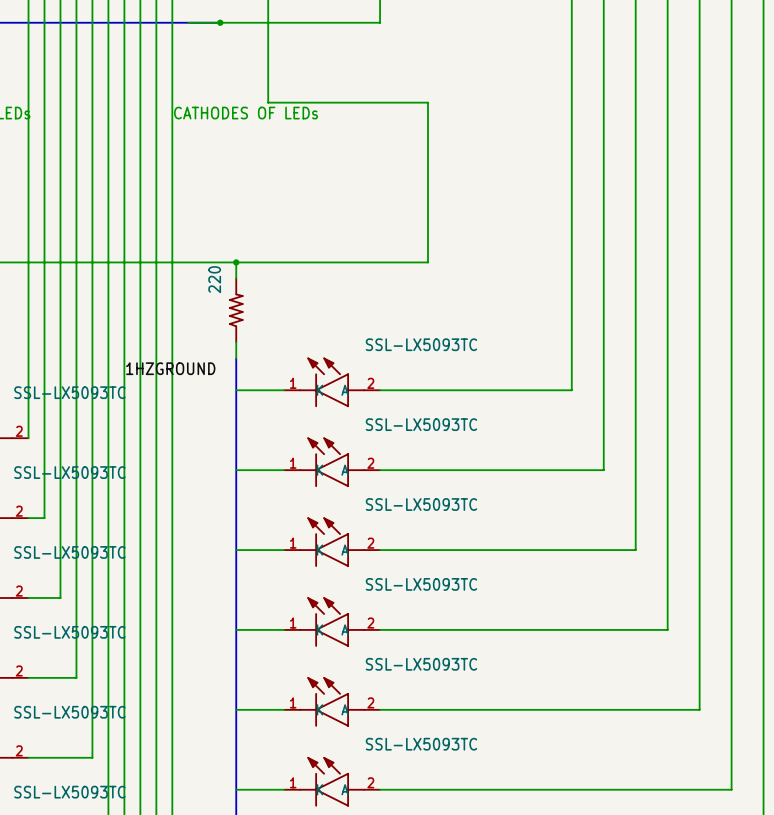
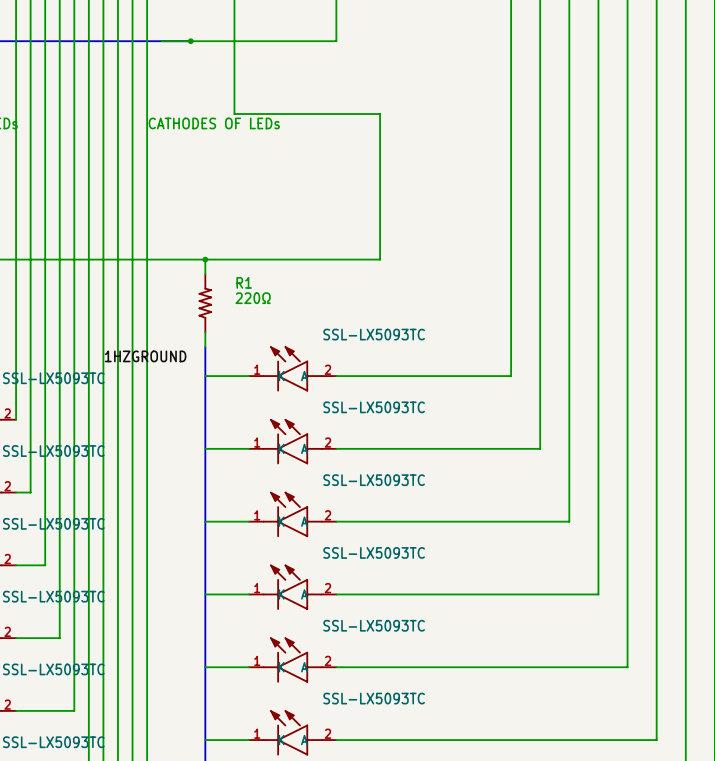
part text: 220 (214, 279) -> none
text: none -> R1 (244, 282)
text: none -> 220Ω (253, 298)

